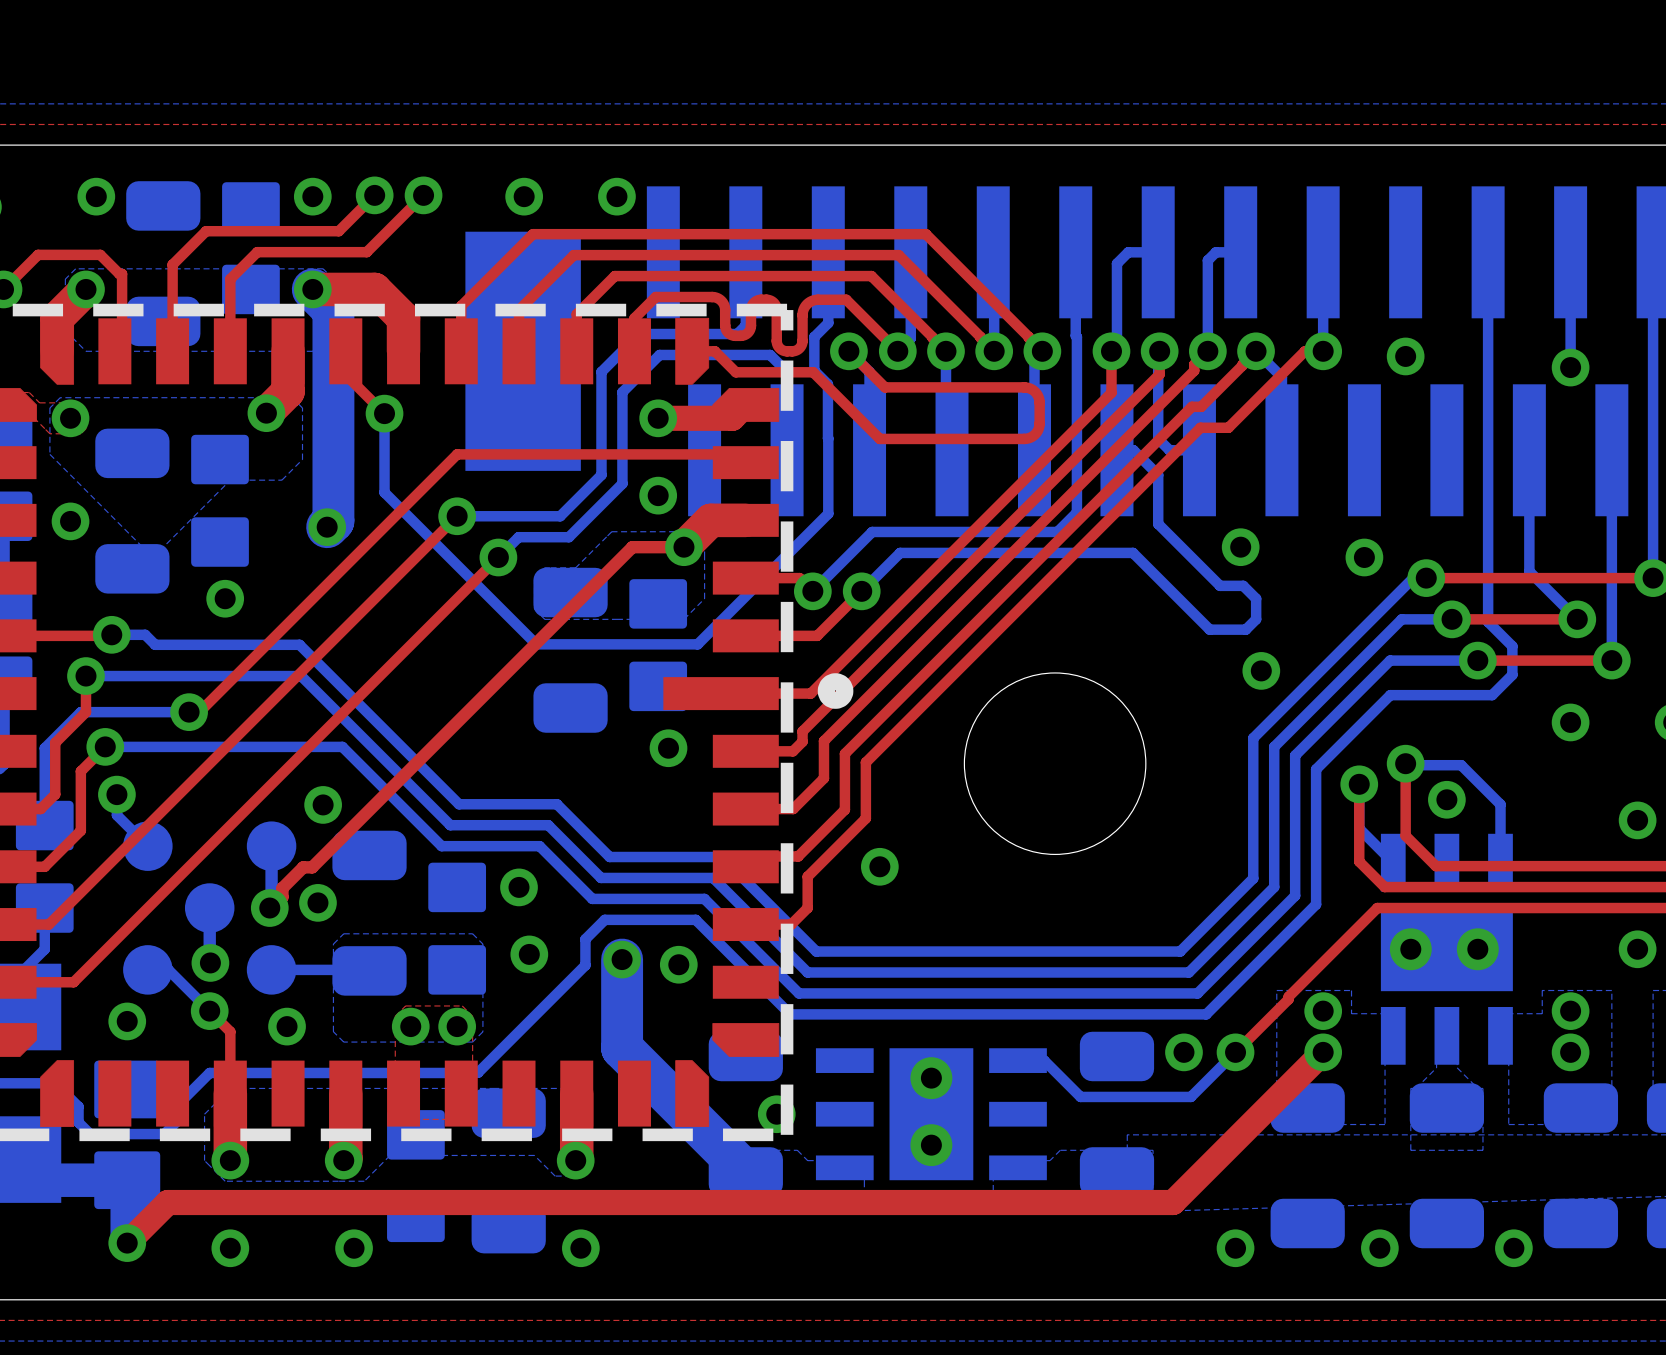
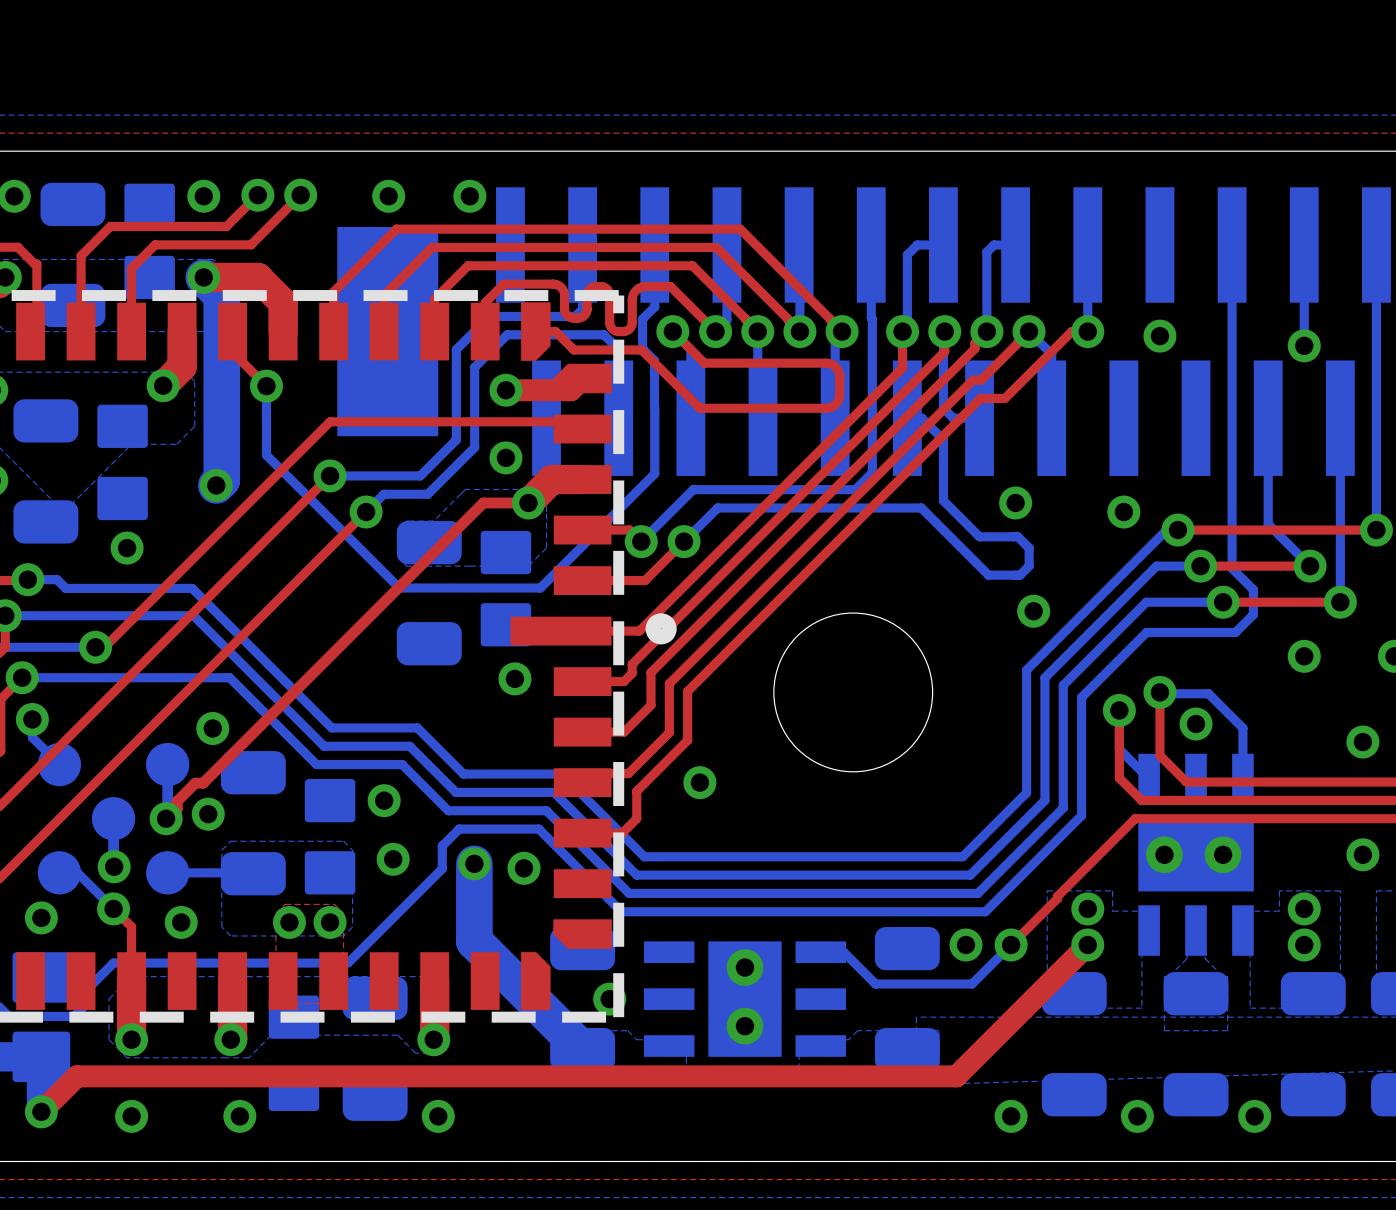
bottom track: (1158, 523) (1220, 585) -> (943, 482) (943, 500) (979, 536) (997, 536)

